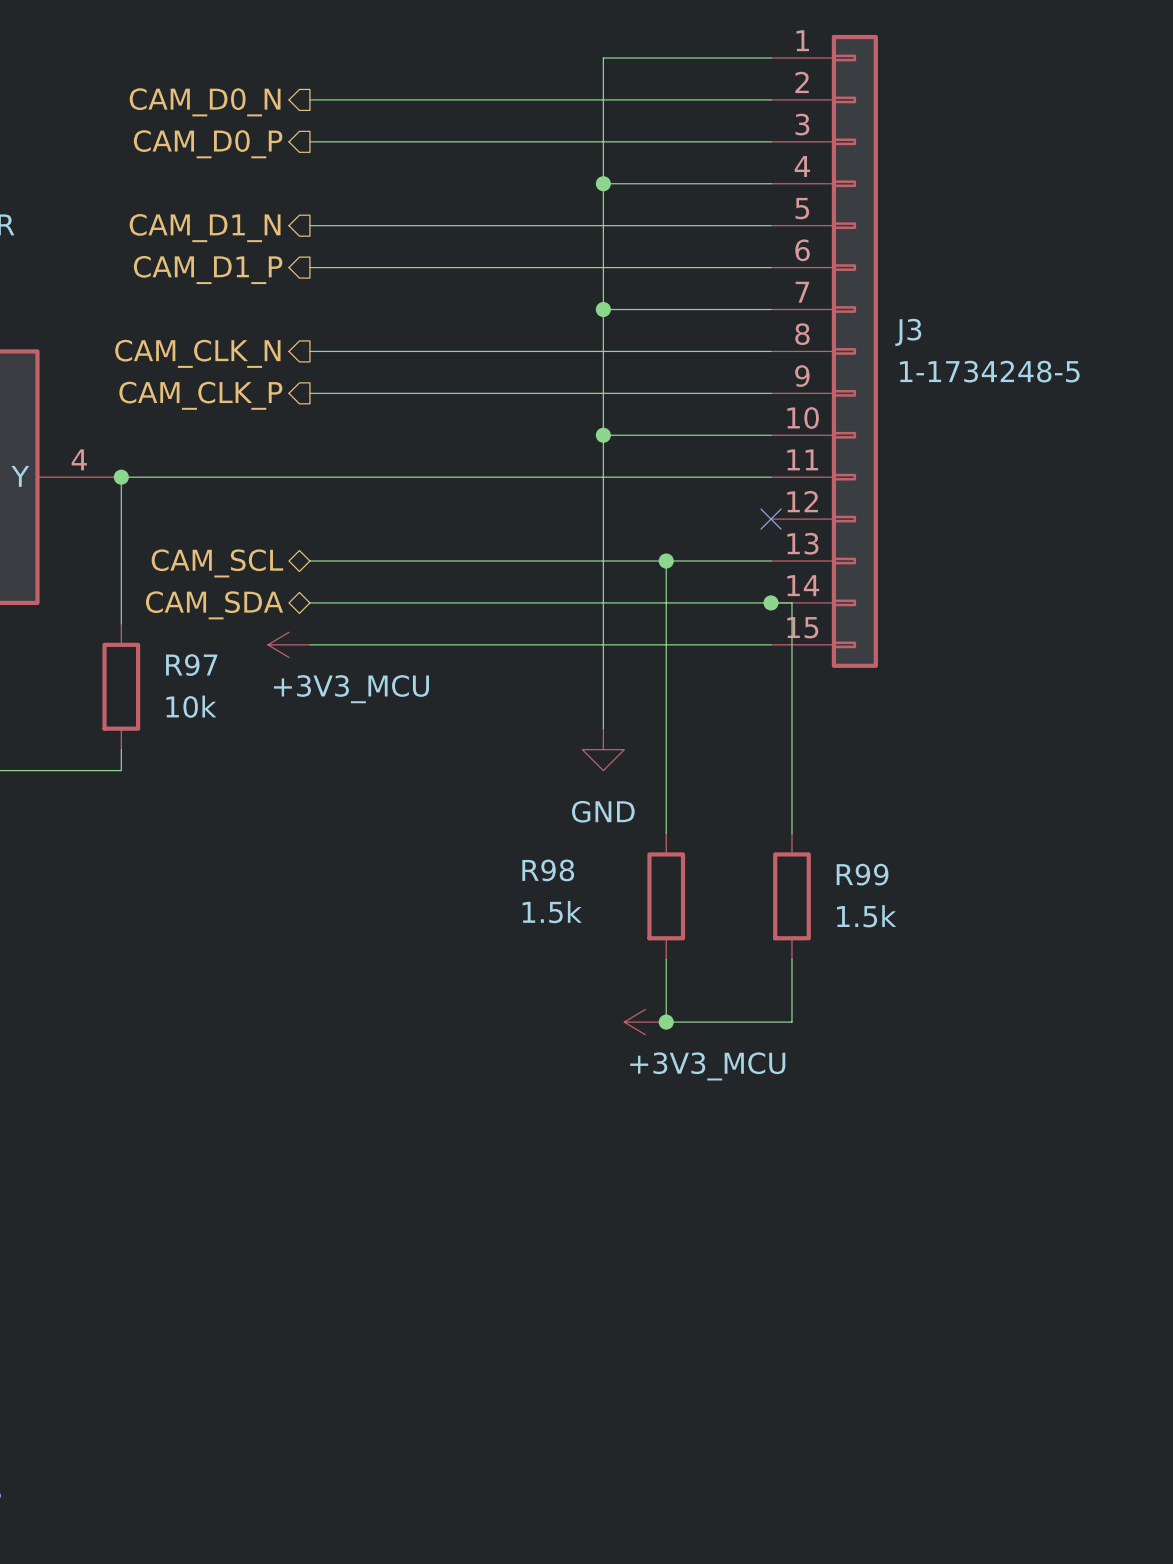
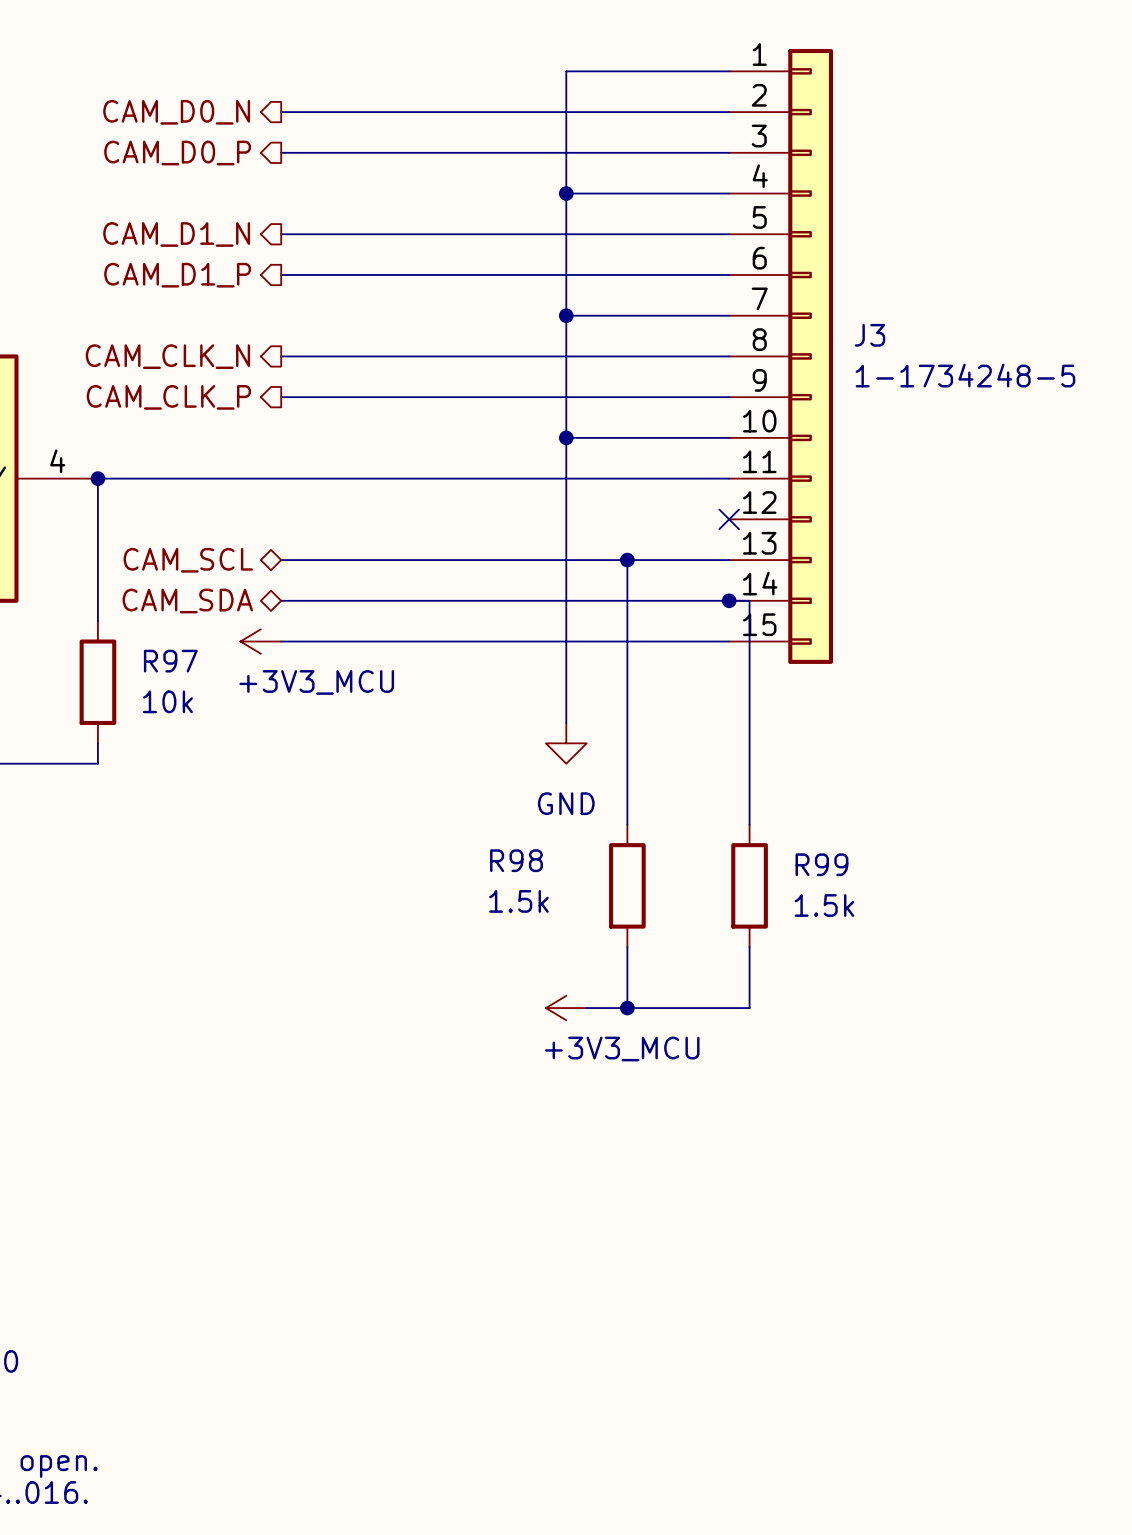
power symbol position: +3V3_MCU (645, 1022) -> +3V3_MCU (566, 1008)

